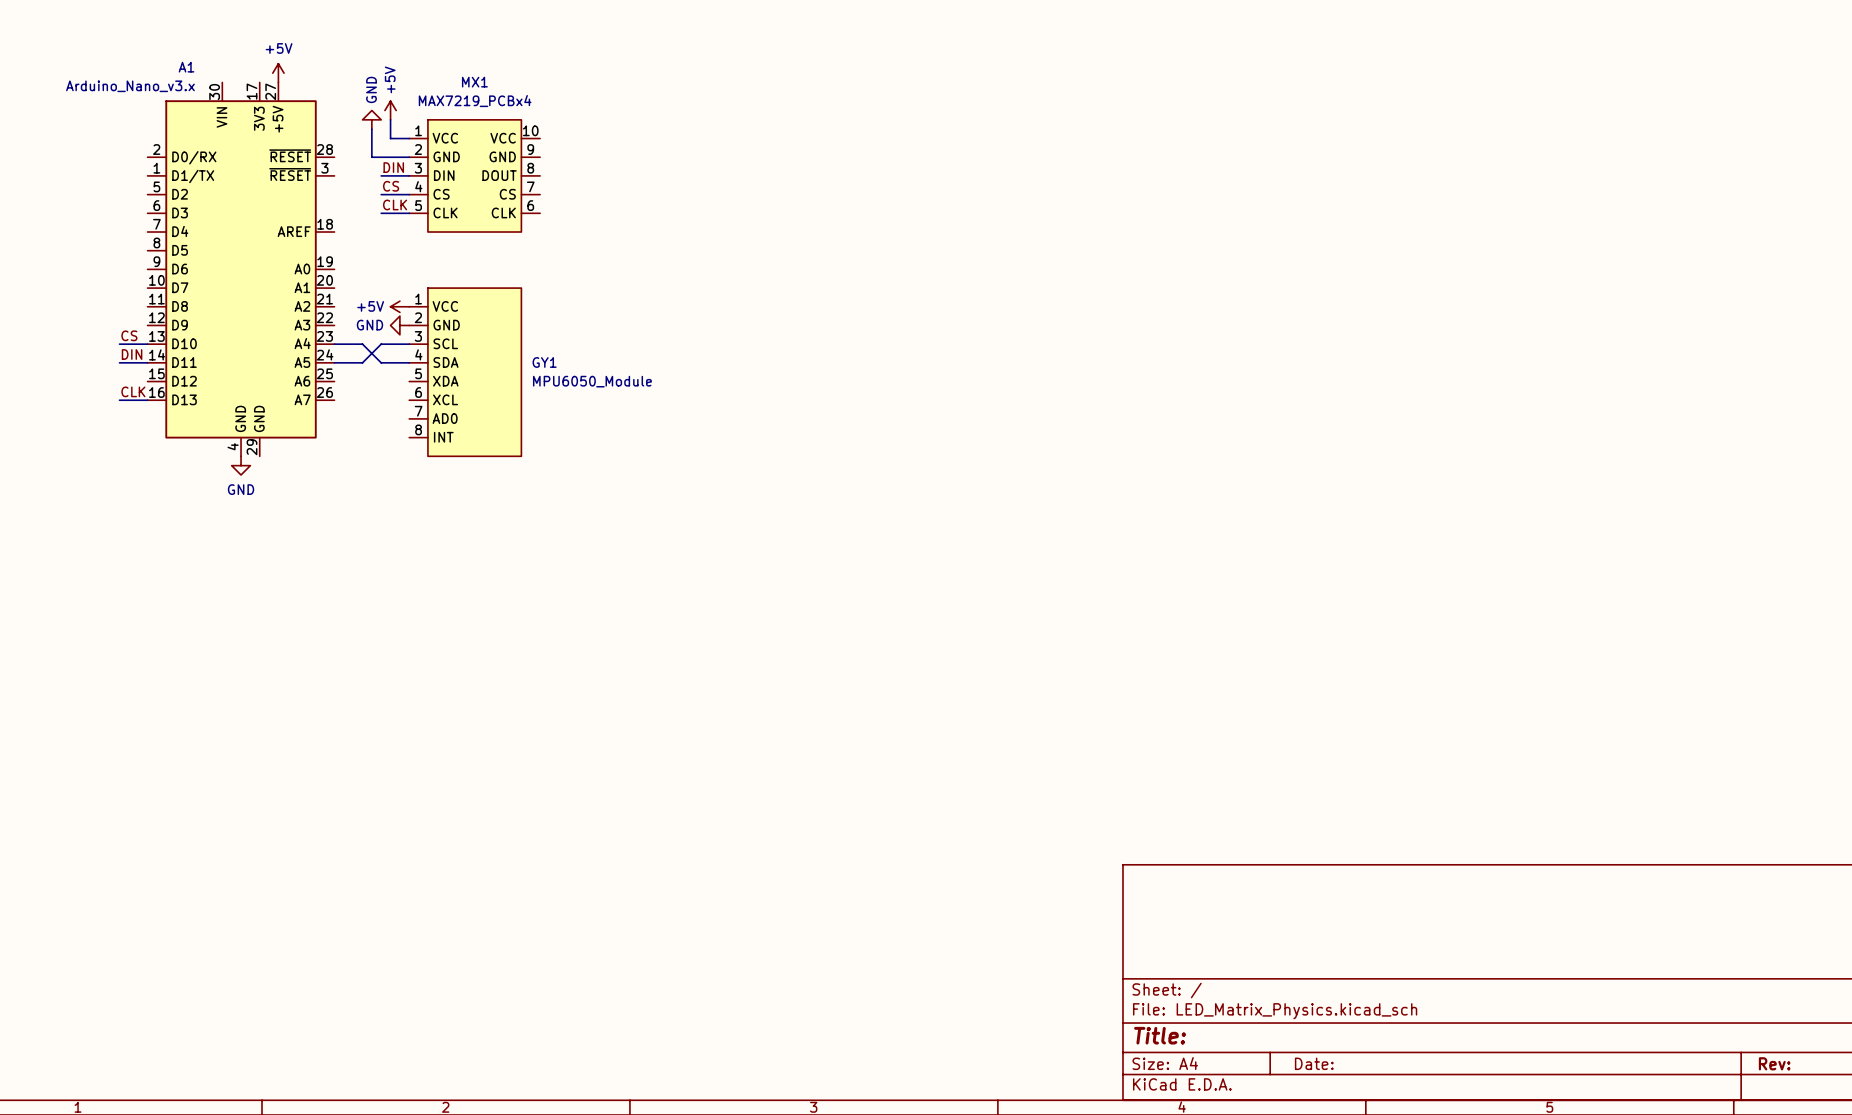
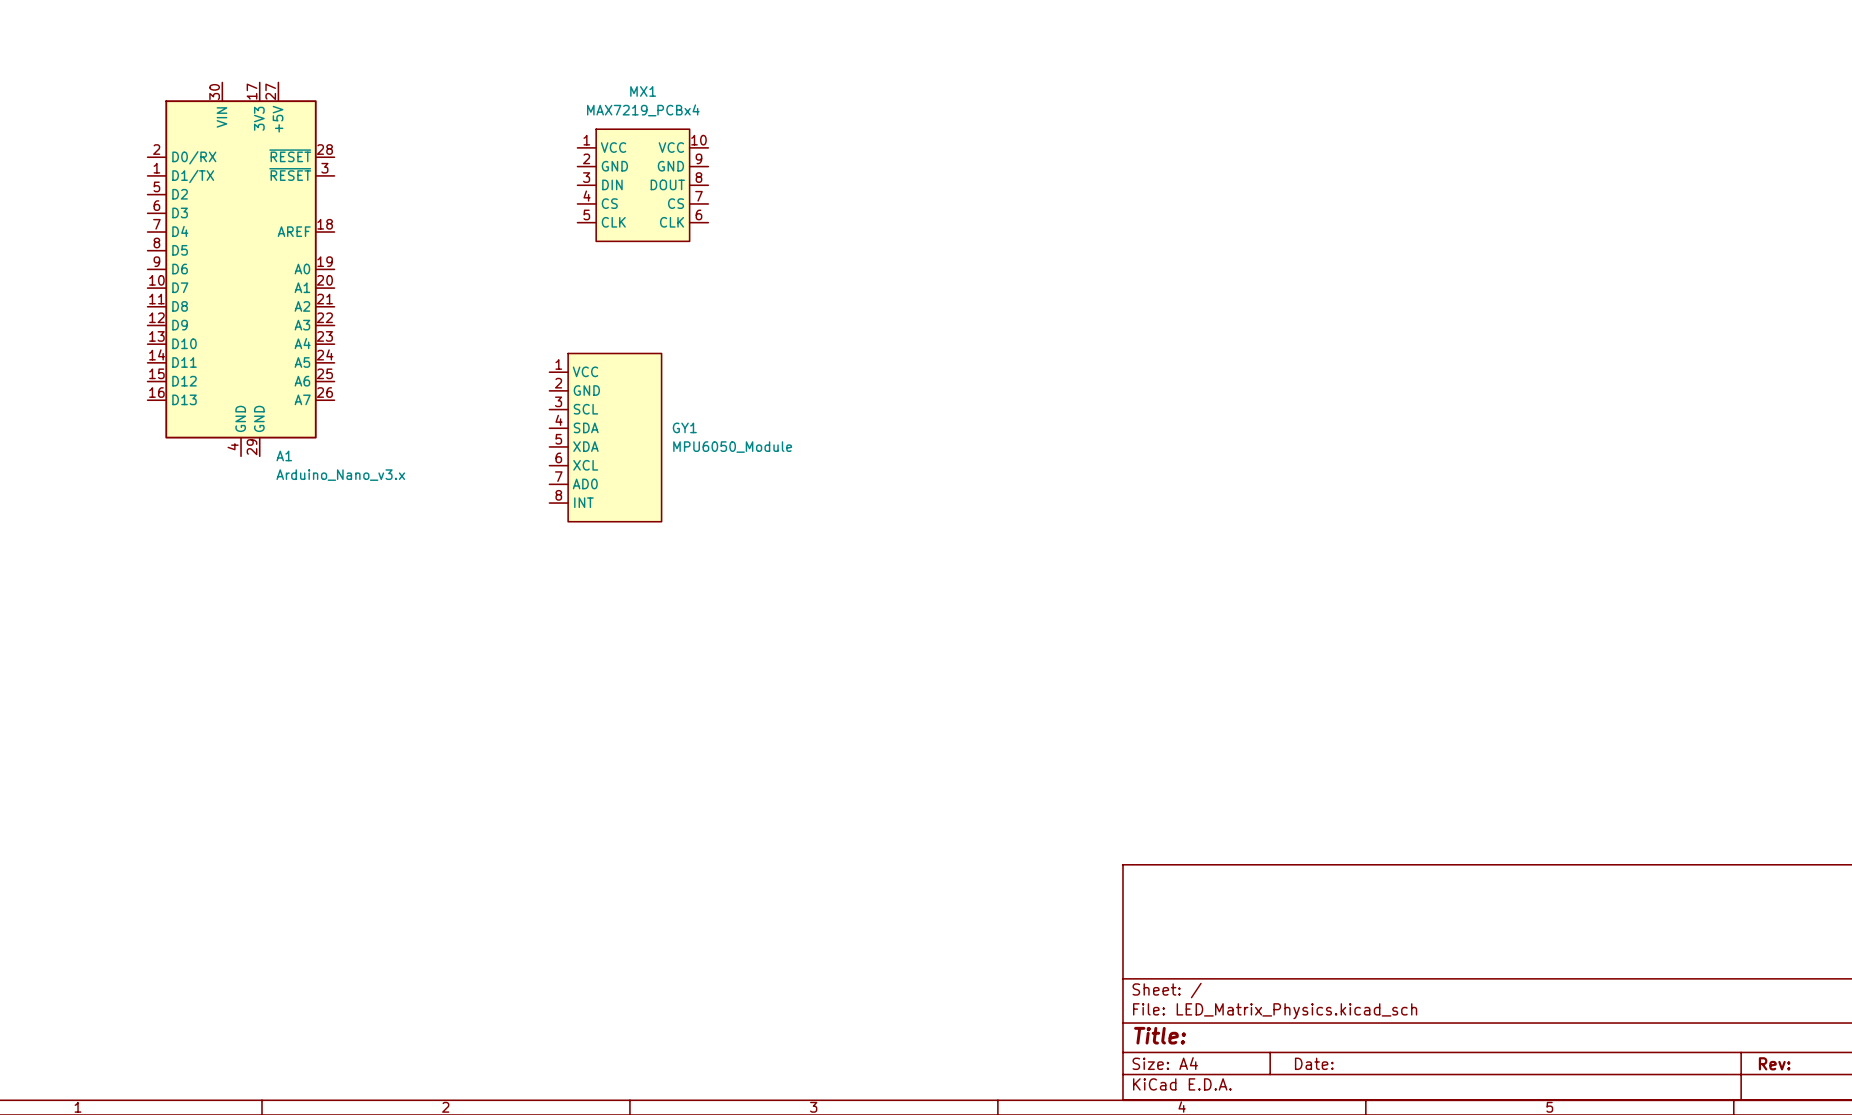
A1 name position: A1 (186, 67) -> A1 (284, 455)
power symbol: +5V (278, 73) -> none
A1 value position: Arduino_Nano_v3.x (130, 86) -> Arduino_Nano_v3.x (340, 475)
power symbol: +5V (390, 110) -> none
power symbol: GND (371, 119) -> none
wire: (390, 119) (390, 138) (409, 138) -> none
wire: (371, 129) (371, 157) (409, 157) -> none
label: DIN (393, 167) -> none
wire: (381, 175) (409, 175) -> none
MX1 position: (474, 175) -> (642, 185)
label: CS (391, 186) -> none
wire: (381, 194) (409, 194) -> none
label: CLK (395, 204) -> none
wire: (381, 213) (409, 213) -> none
power symbol: +5V (399, 306) -> none
power symbol: GND (399, 325) -> none
label: CS (129, 335) -> none
wire: (119, 344) (147, 344) -> none
wire: (334, 344) (362, 344) (381, 362) (409, 362) -> none
wire: (409, 344) (381, 344) (362, 362) (334, 362) -> none
label: DIN (132, 354) -> none
wire: (119, 362) (147, 362) -> none
GY1 position: (465, 372) -> (605, 437)
label: CLK (133, 391) -> none
wire: (119, 400) (147, 400) -> none
power symbol: GND (241, 465) -> none

